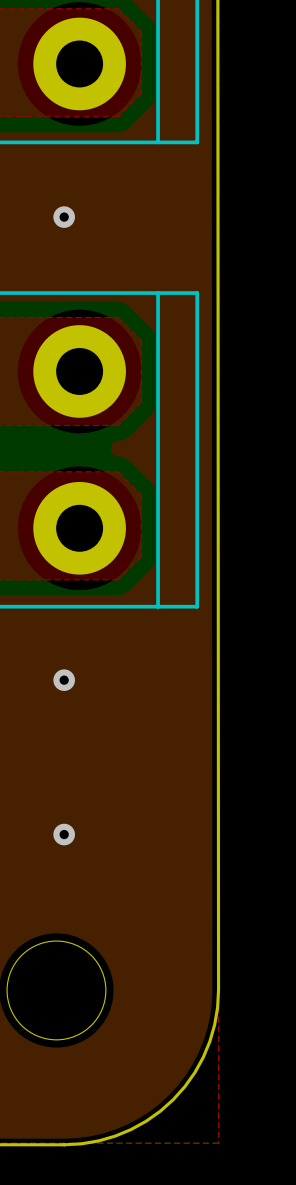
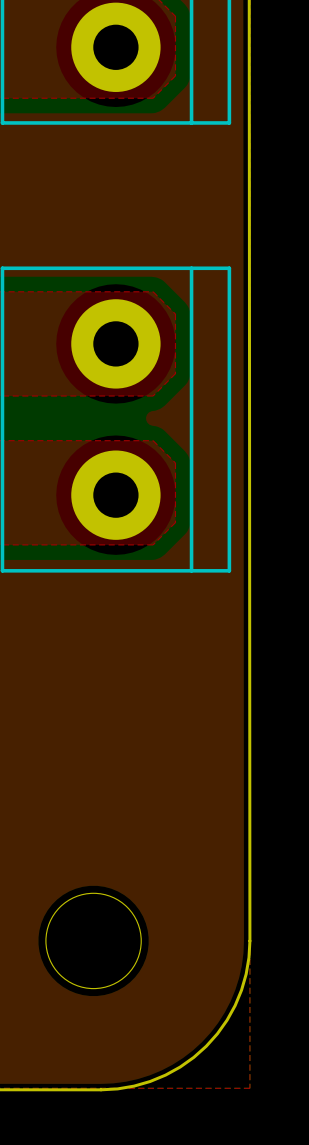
via: (64, 217) -> none
via: (64, 680) -> none
via: (64, 834) -> none

